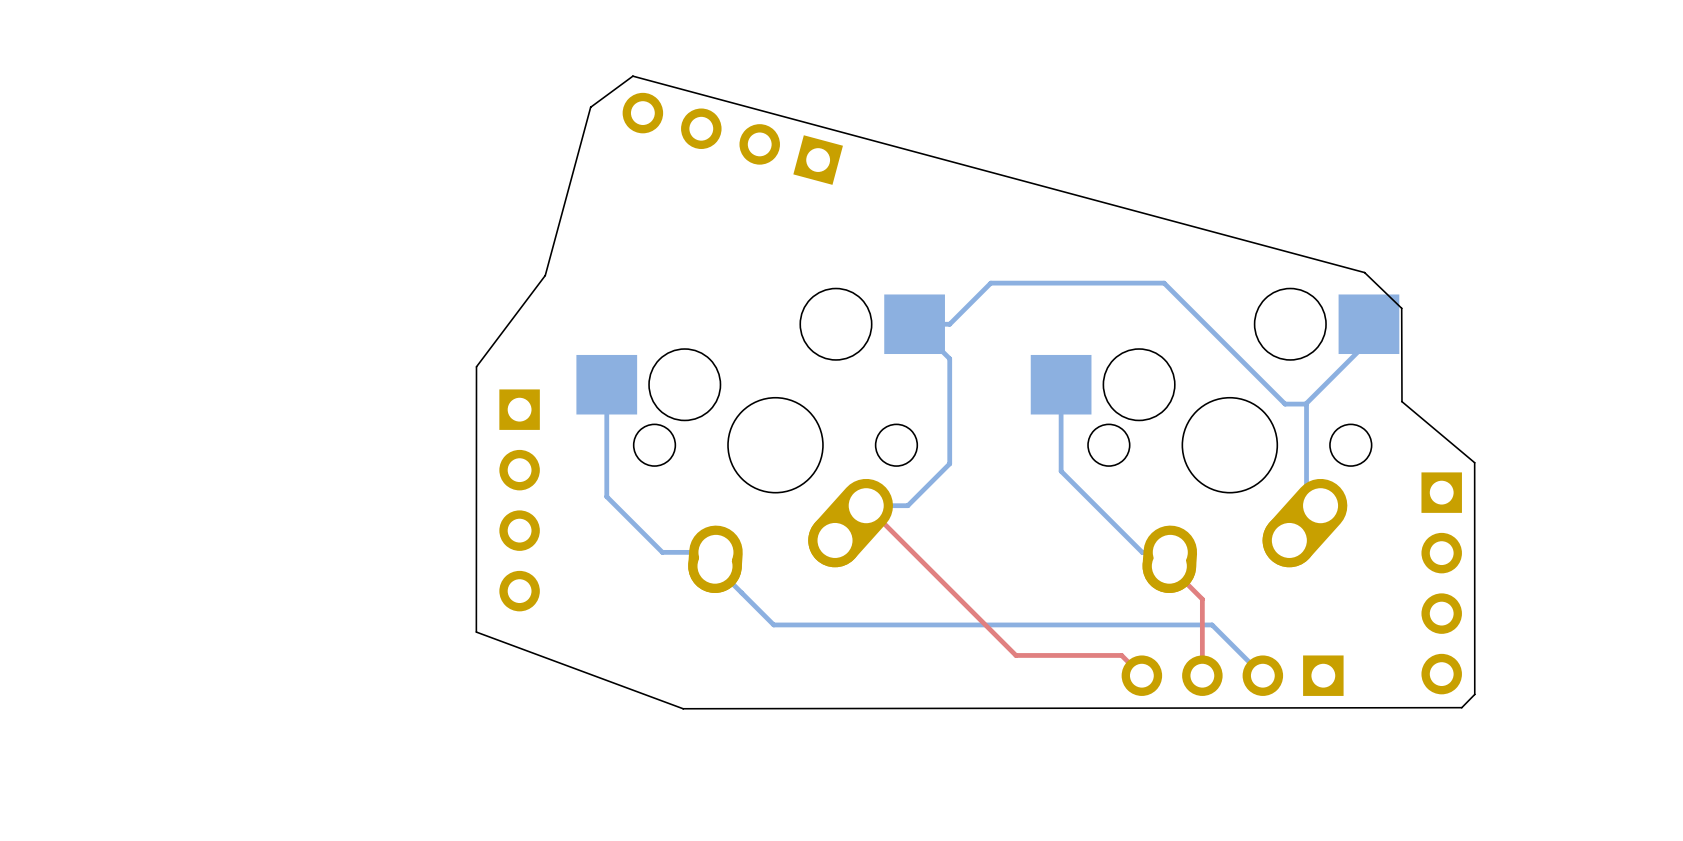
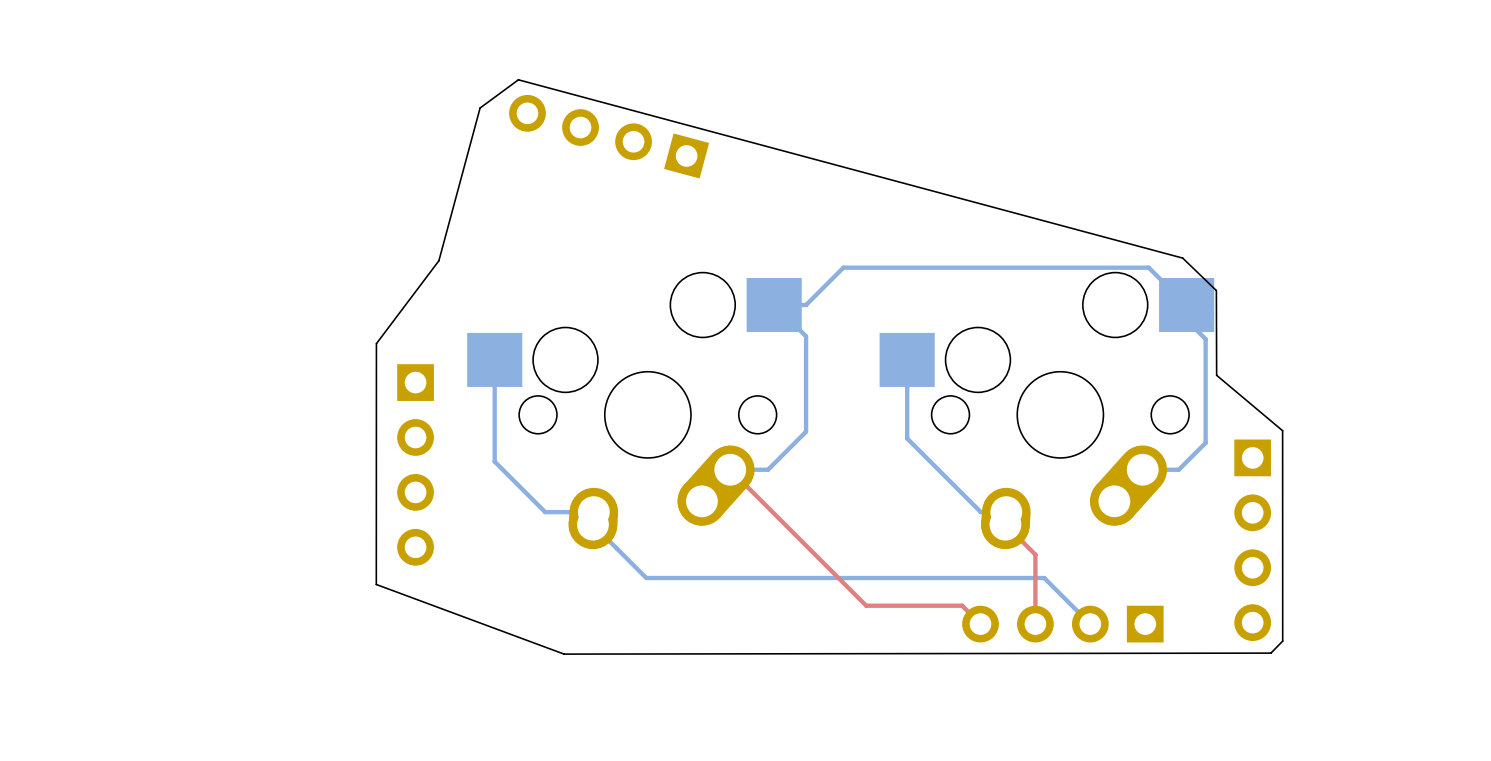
bottom track: (1164, 283) (1285, 404) (1306, 404) -> (1000, 267) (1148, 267) (1186, 305)
bottom track: (1368, 340) (1306, 403) (1306, 491) (1320, 505) -> (1186, 320) (1205, 339) (1205, 442) (1178, 469) (1142, 469)

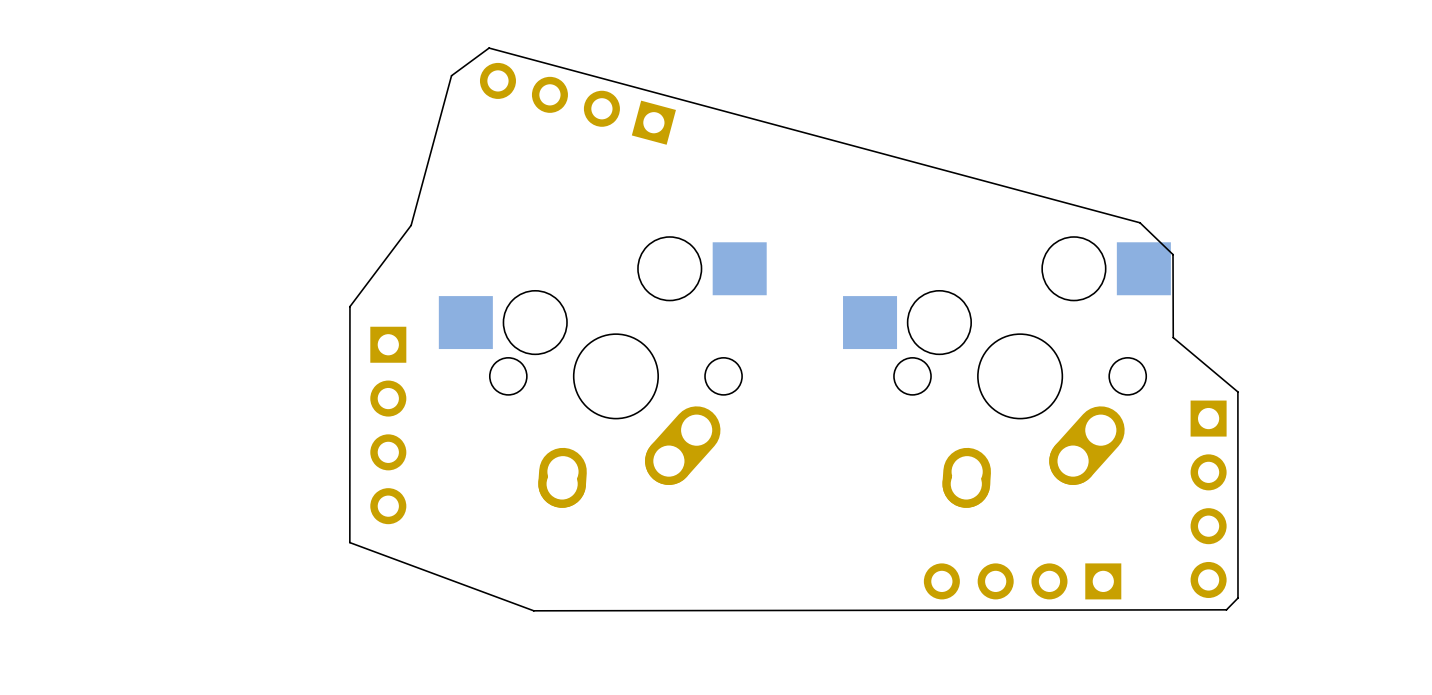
bottom track: (774, 305) (806, 305) (843, 267) (1148, 267) (1186, 305) (1186, 320) (1205, 339) (1205, 442) (1178, 469) (1142, 469) -> none
bottom track: (774, 305) (806, 336) (806, 431) (768, 469) (730, 469) -> none
bottom track: (494, 359) (494, 461) (545, 512) (593, 512) -> none
bottom track: (907, 359) (907, 438) (980, 512) (1006, 512) -> none
top track: (730, 469) (866, 605) (962, 605) (980, 624) -> none
top track: (1006, 512) (1006, 525) (1035, 554) (1035, 624) -> none
bottom track: (592, 524) (646, 578) (1044, 578) (1090, 624) -> none

